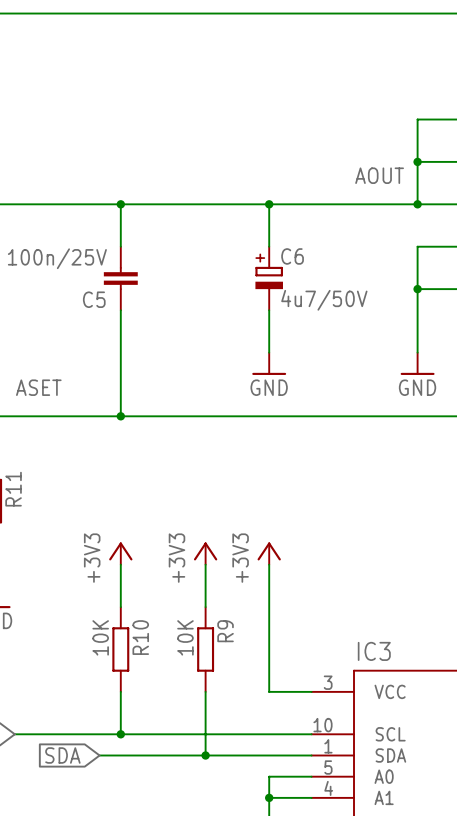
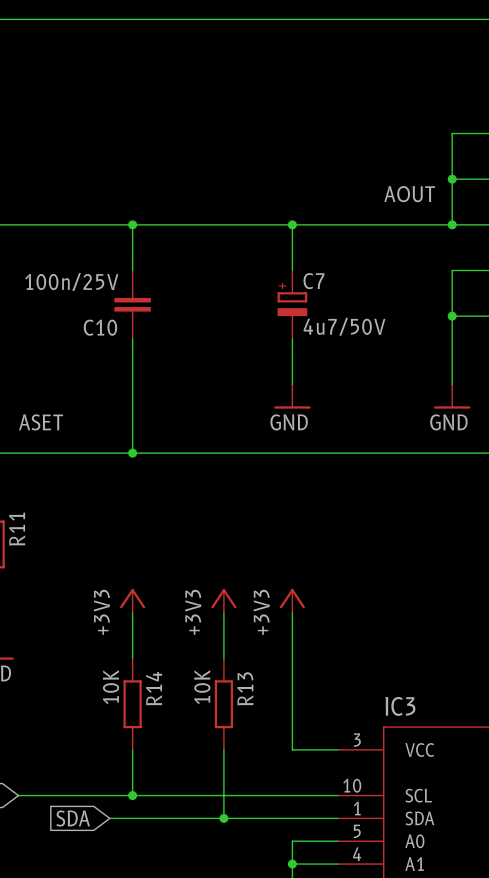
C6 name: C6 (292, 256) -> C7 (313, 281)
C5 name: C5 (94, 299) -> C10 (100, 327)
R9 name: R9 (225, 631) -> R13 (245, 688)
R10 name: R10 (140, 637) -> R14 (154, 688)

